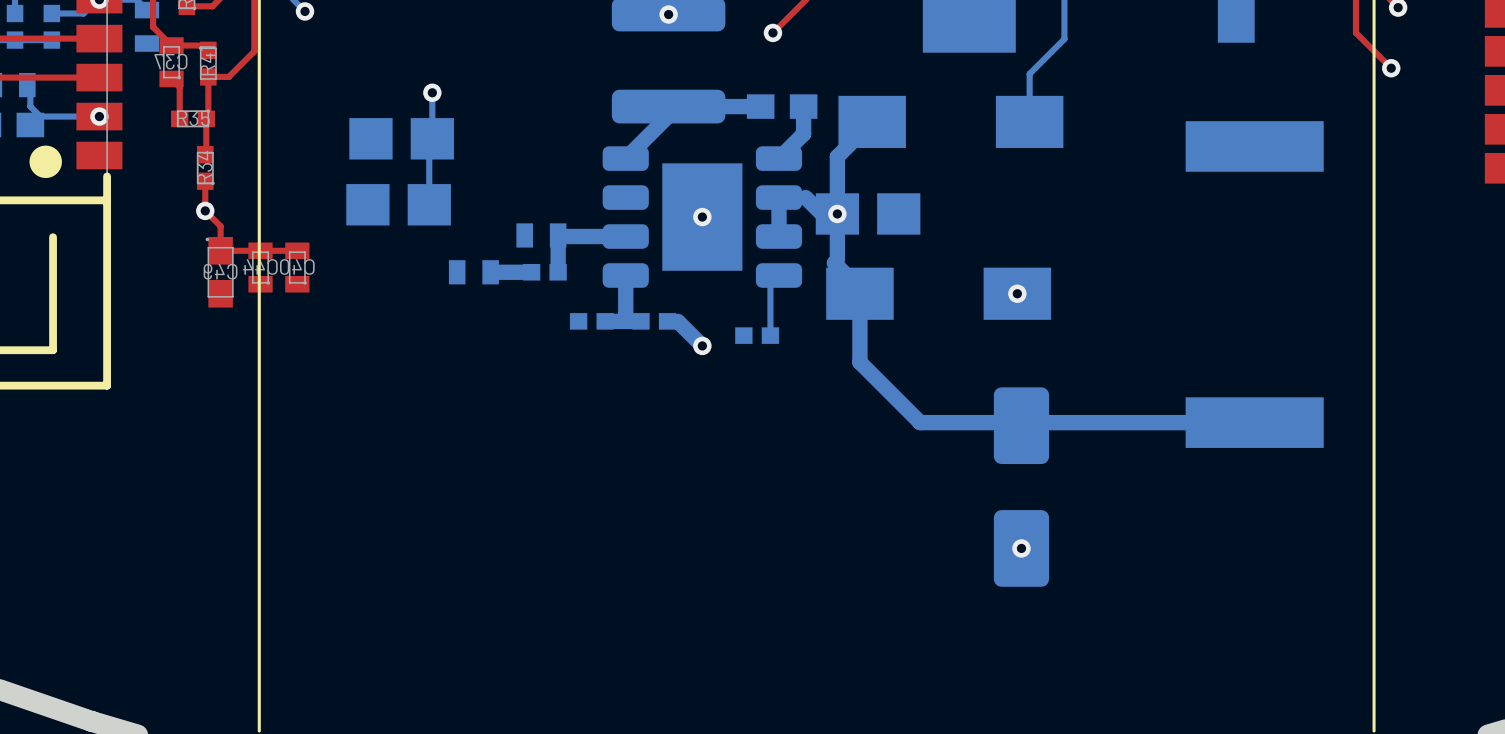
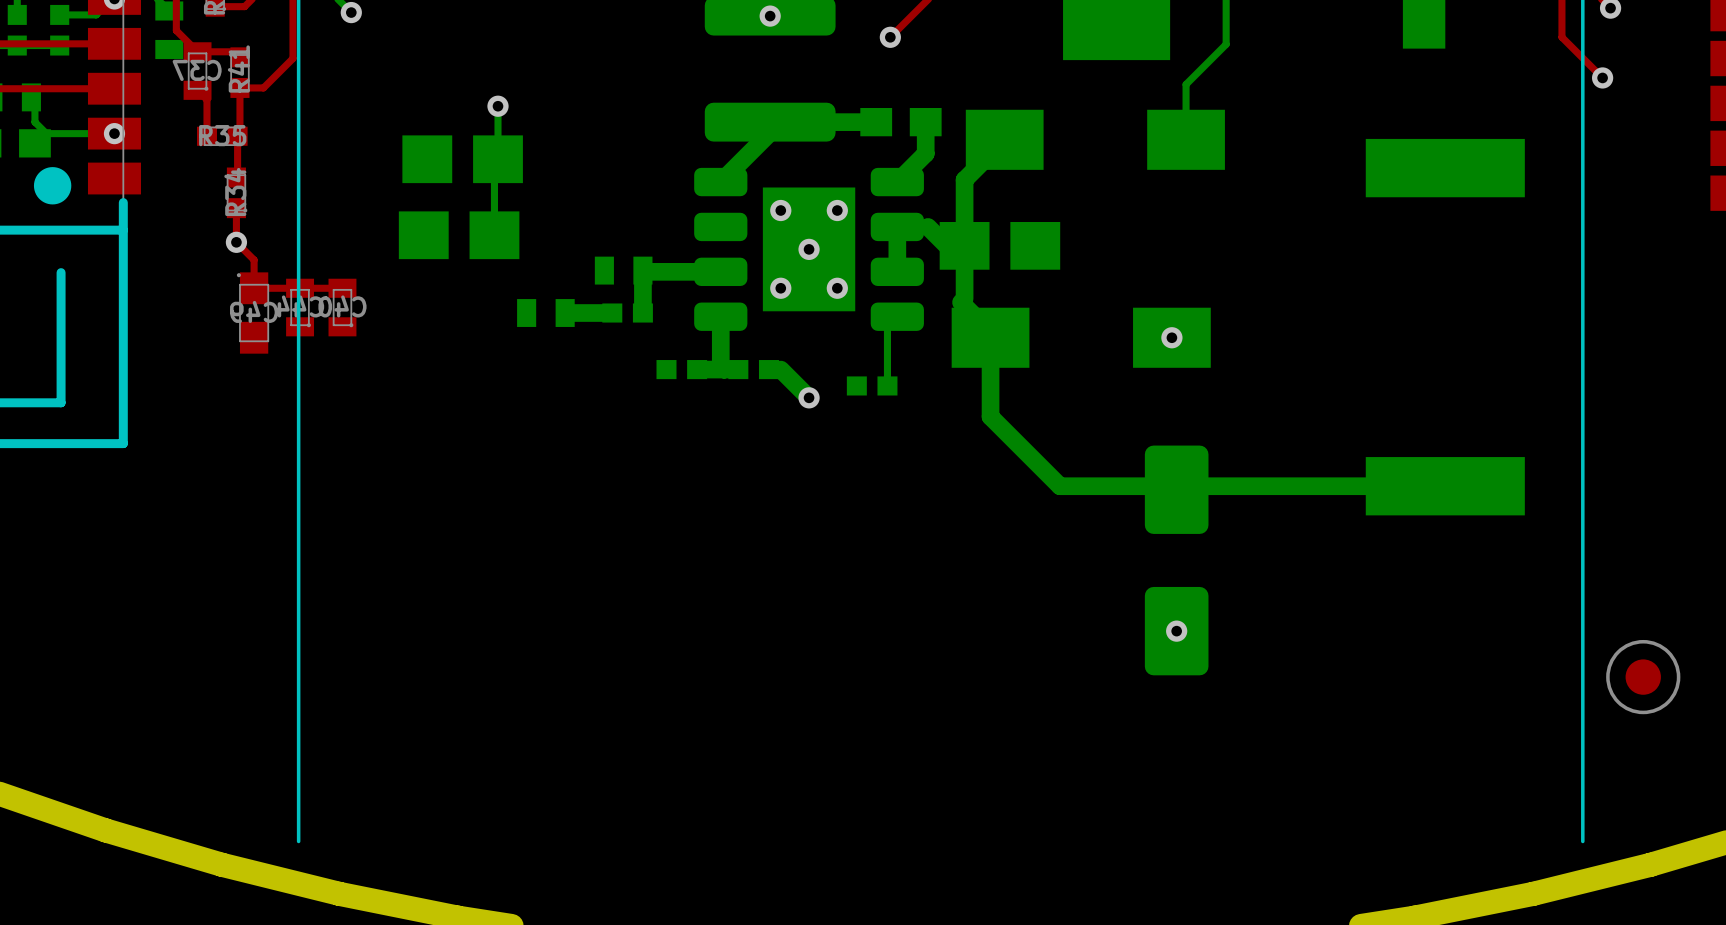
via: none -> (780, 210)
via: none -> (837, 210)
via: (837, 213) -> none
via: none -> (780, 288)
via: none -> (837, 288)
part: none -> (1643, 677)

